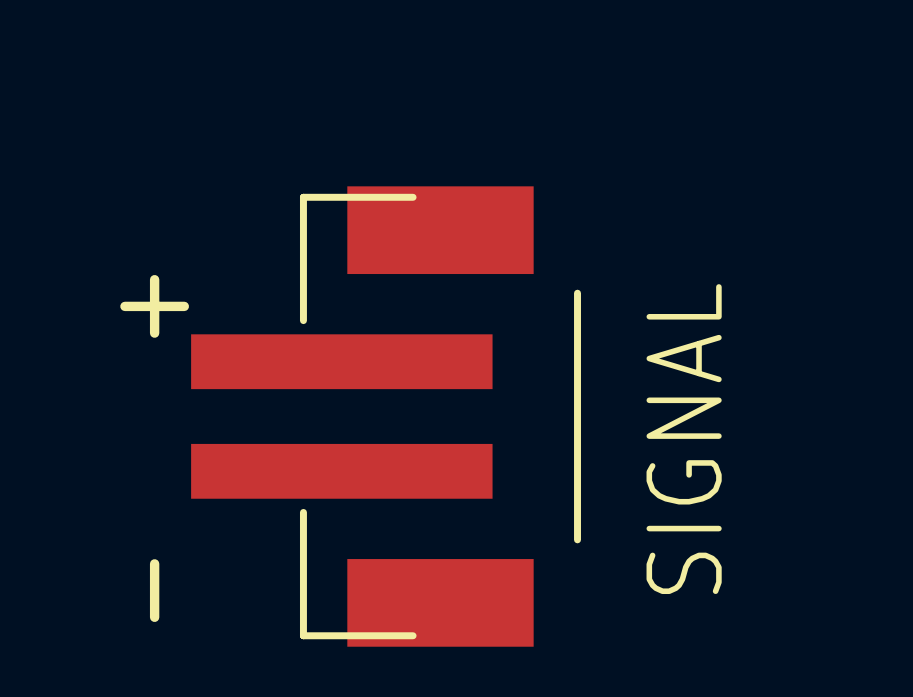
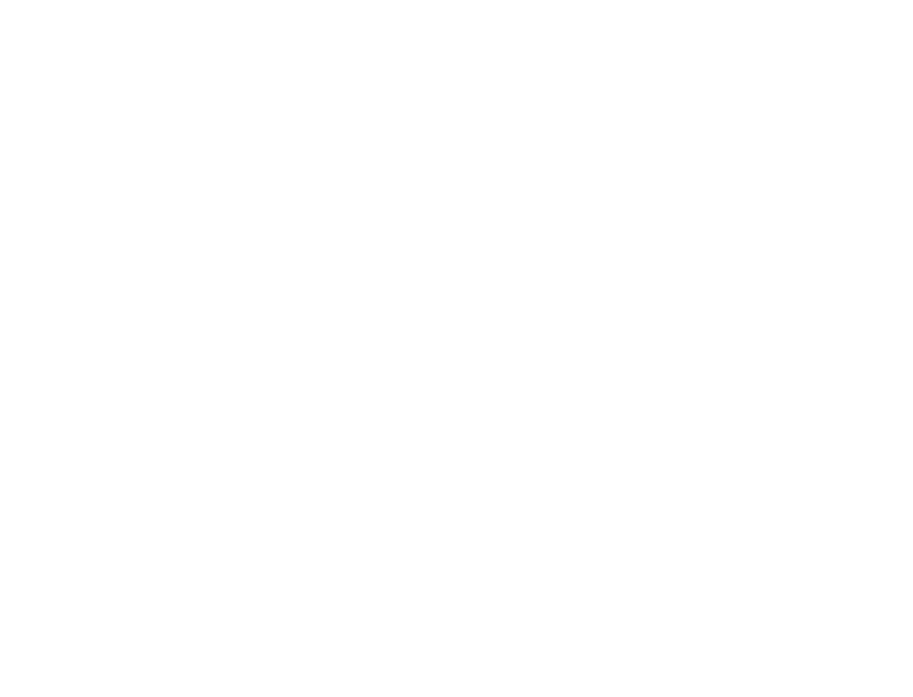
SIGNAL: (386, 416) -> none

